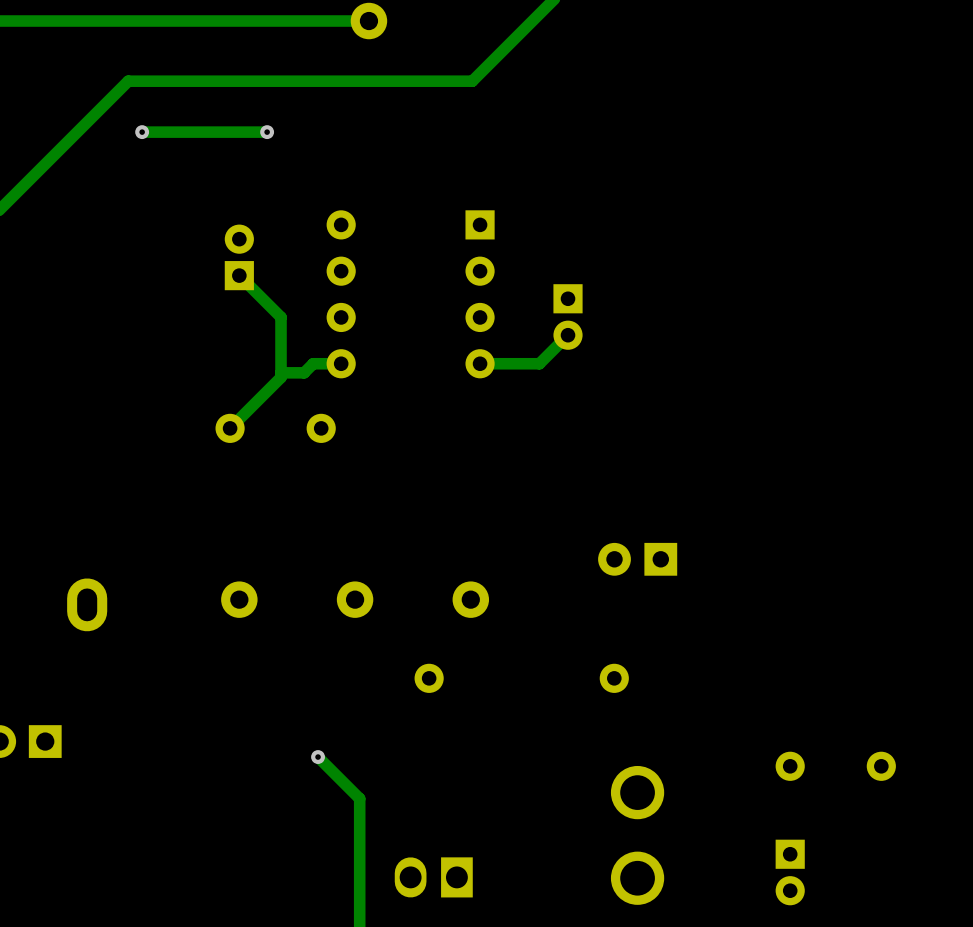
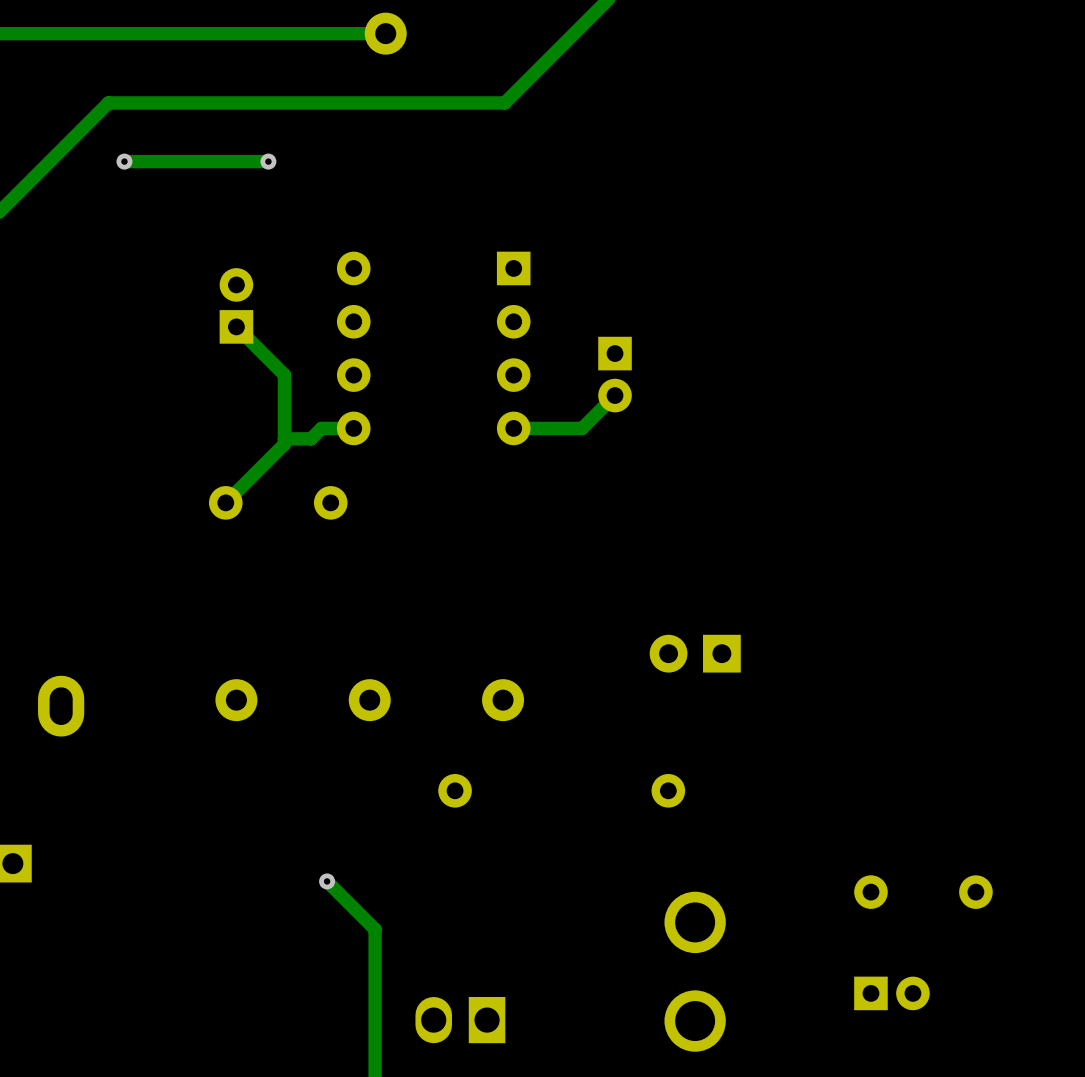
part rotation: 0° (790, 872) -> 90° counterclockwise (891, 993)

